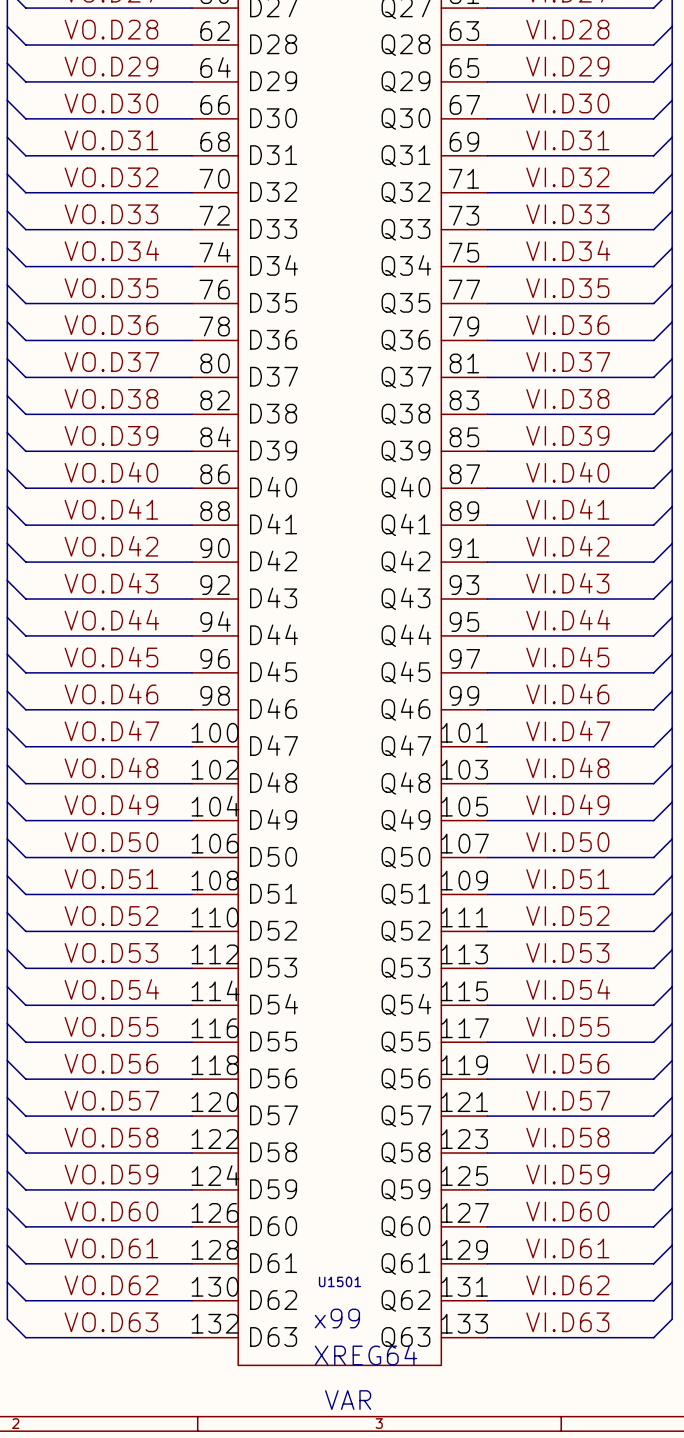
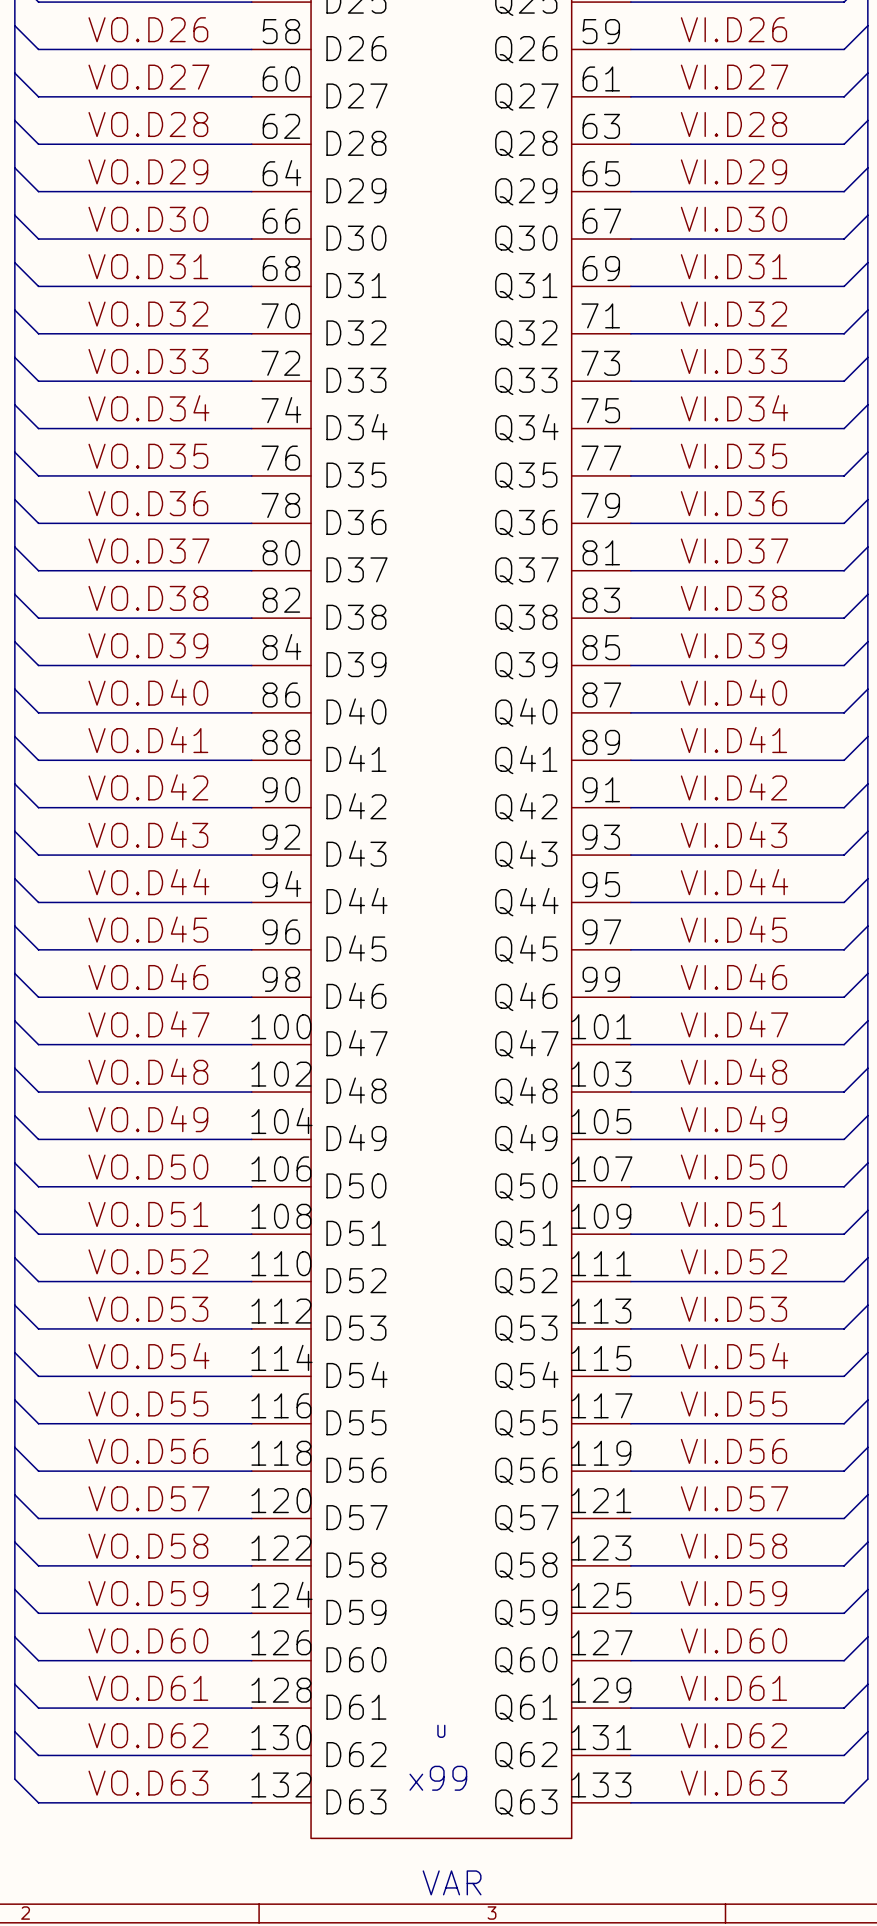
U1501 name: U1501 (339, 1281) -> U (441, 1731)
U1501 value: XREG64 (365, 1355) -> none

